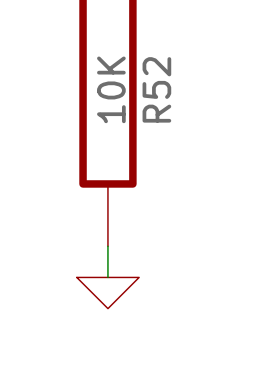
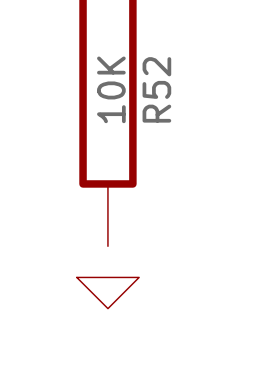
wire: (107, 246) (107, 277) -> none

